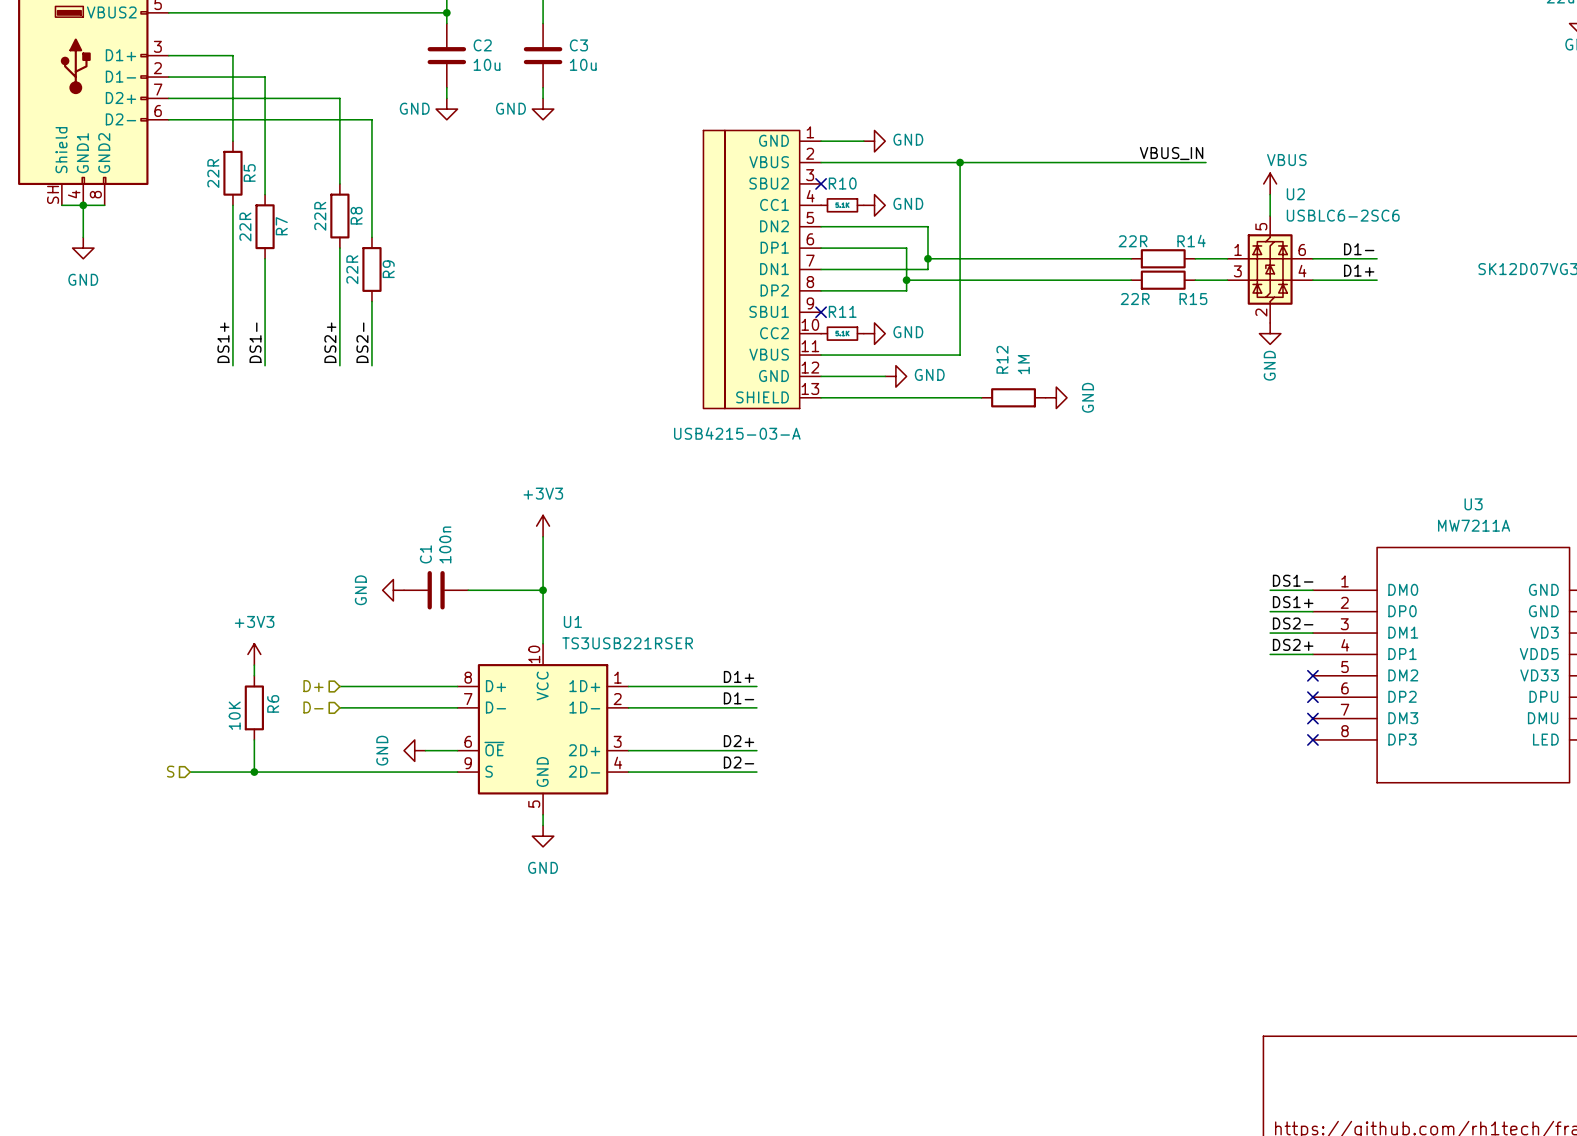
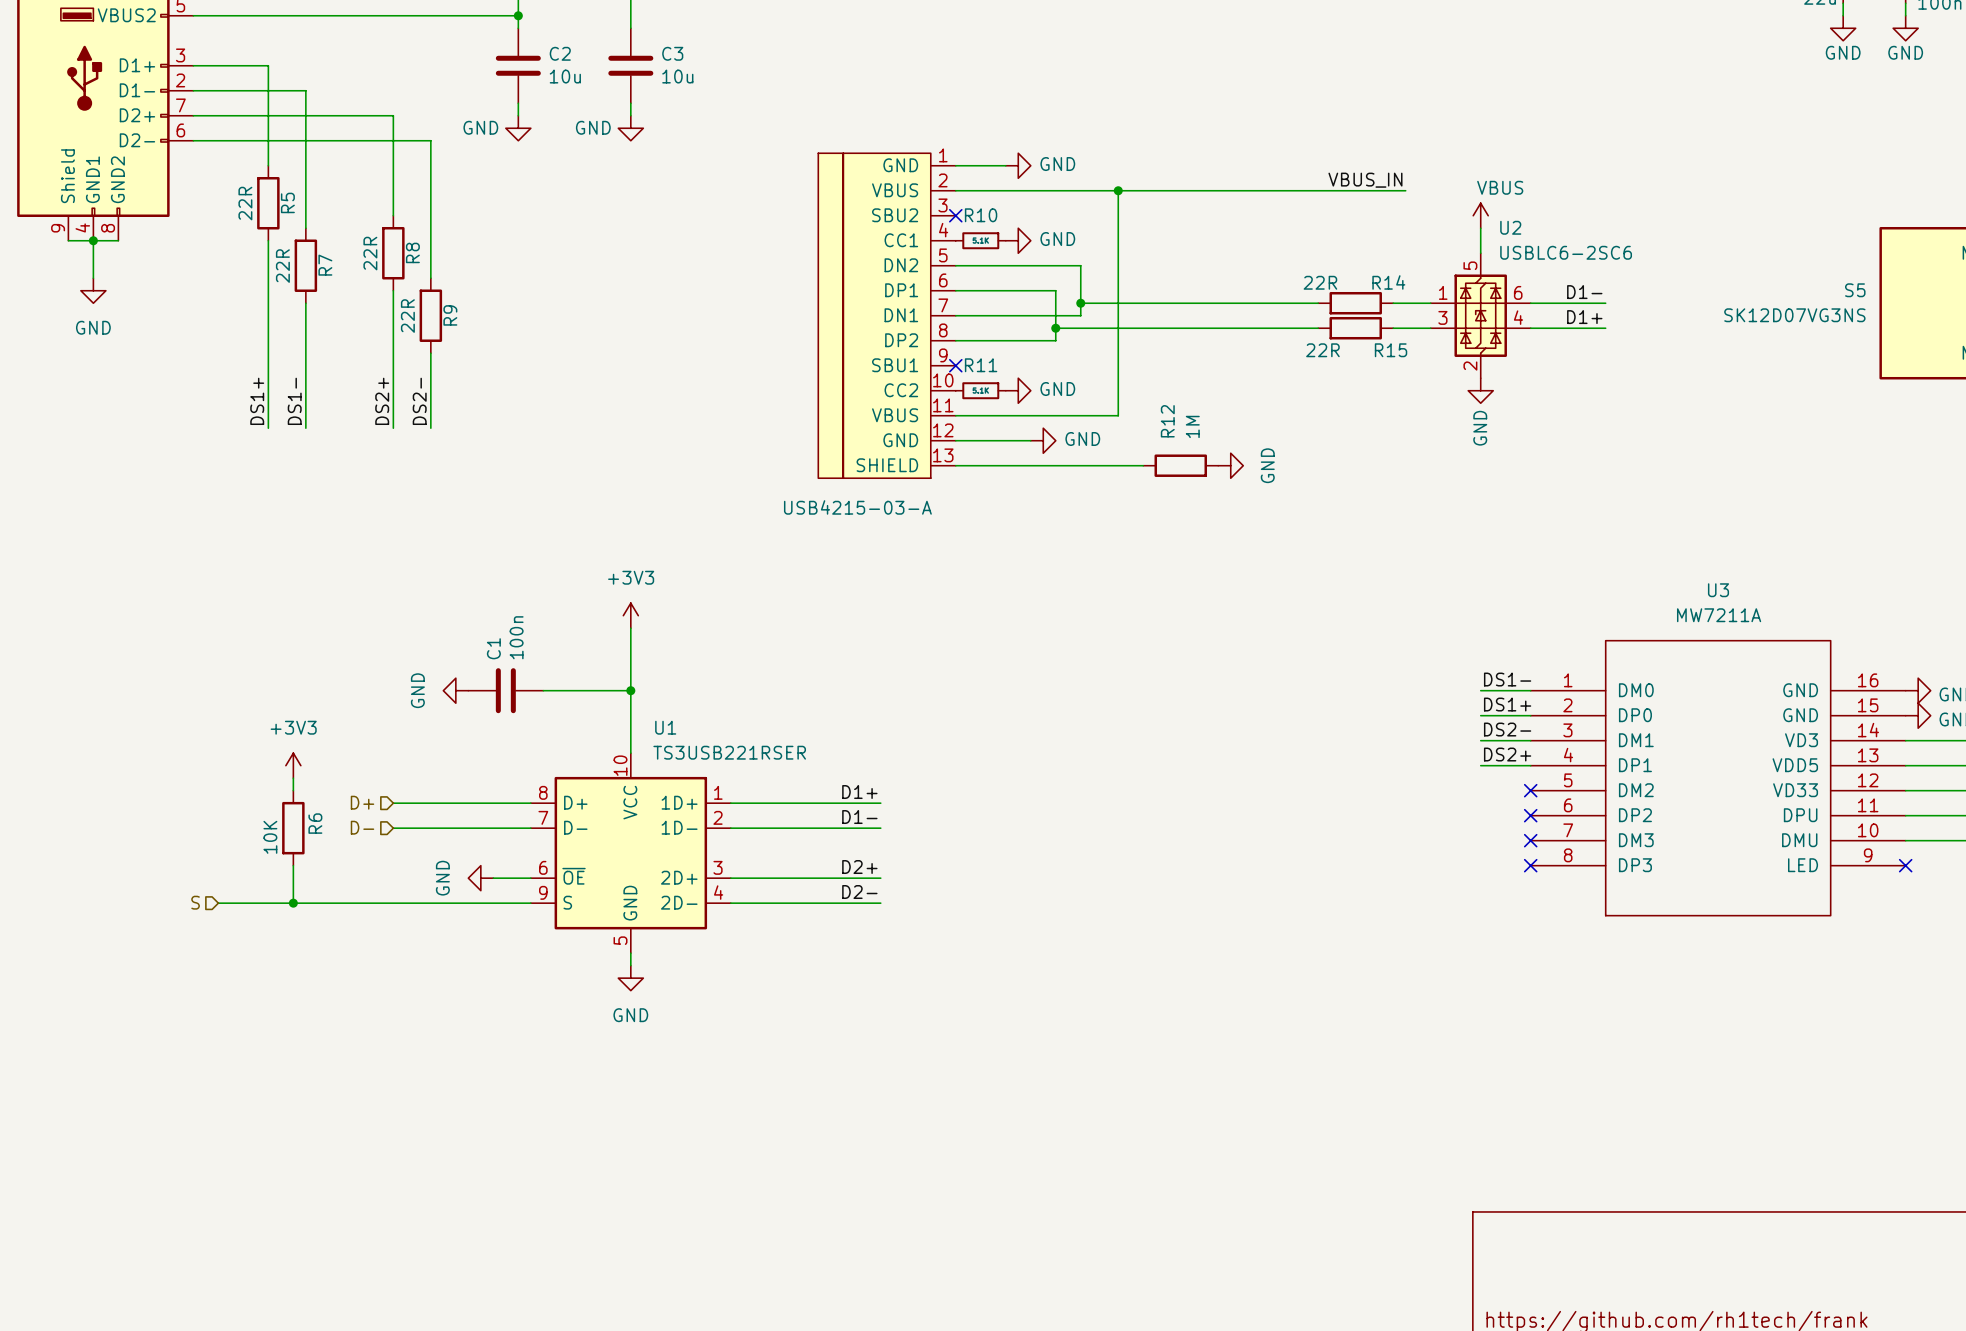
part pin number: SH (53, 194) -> 9 (58, 228)

